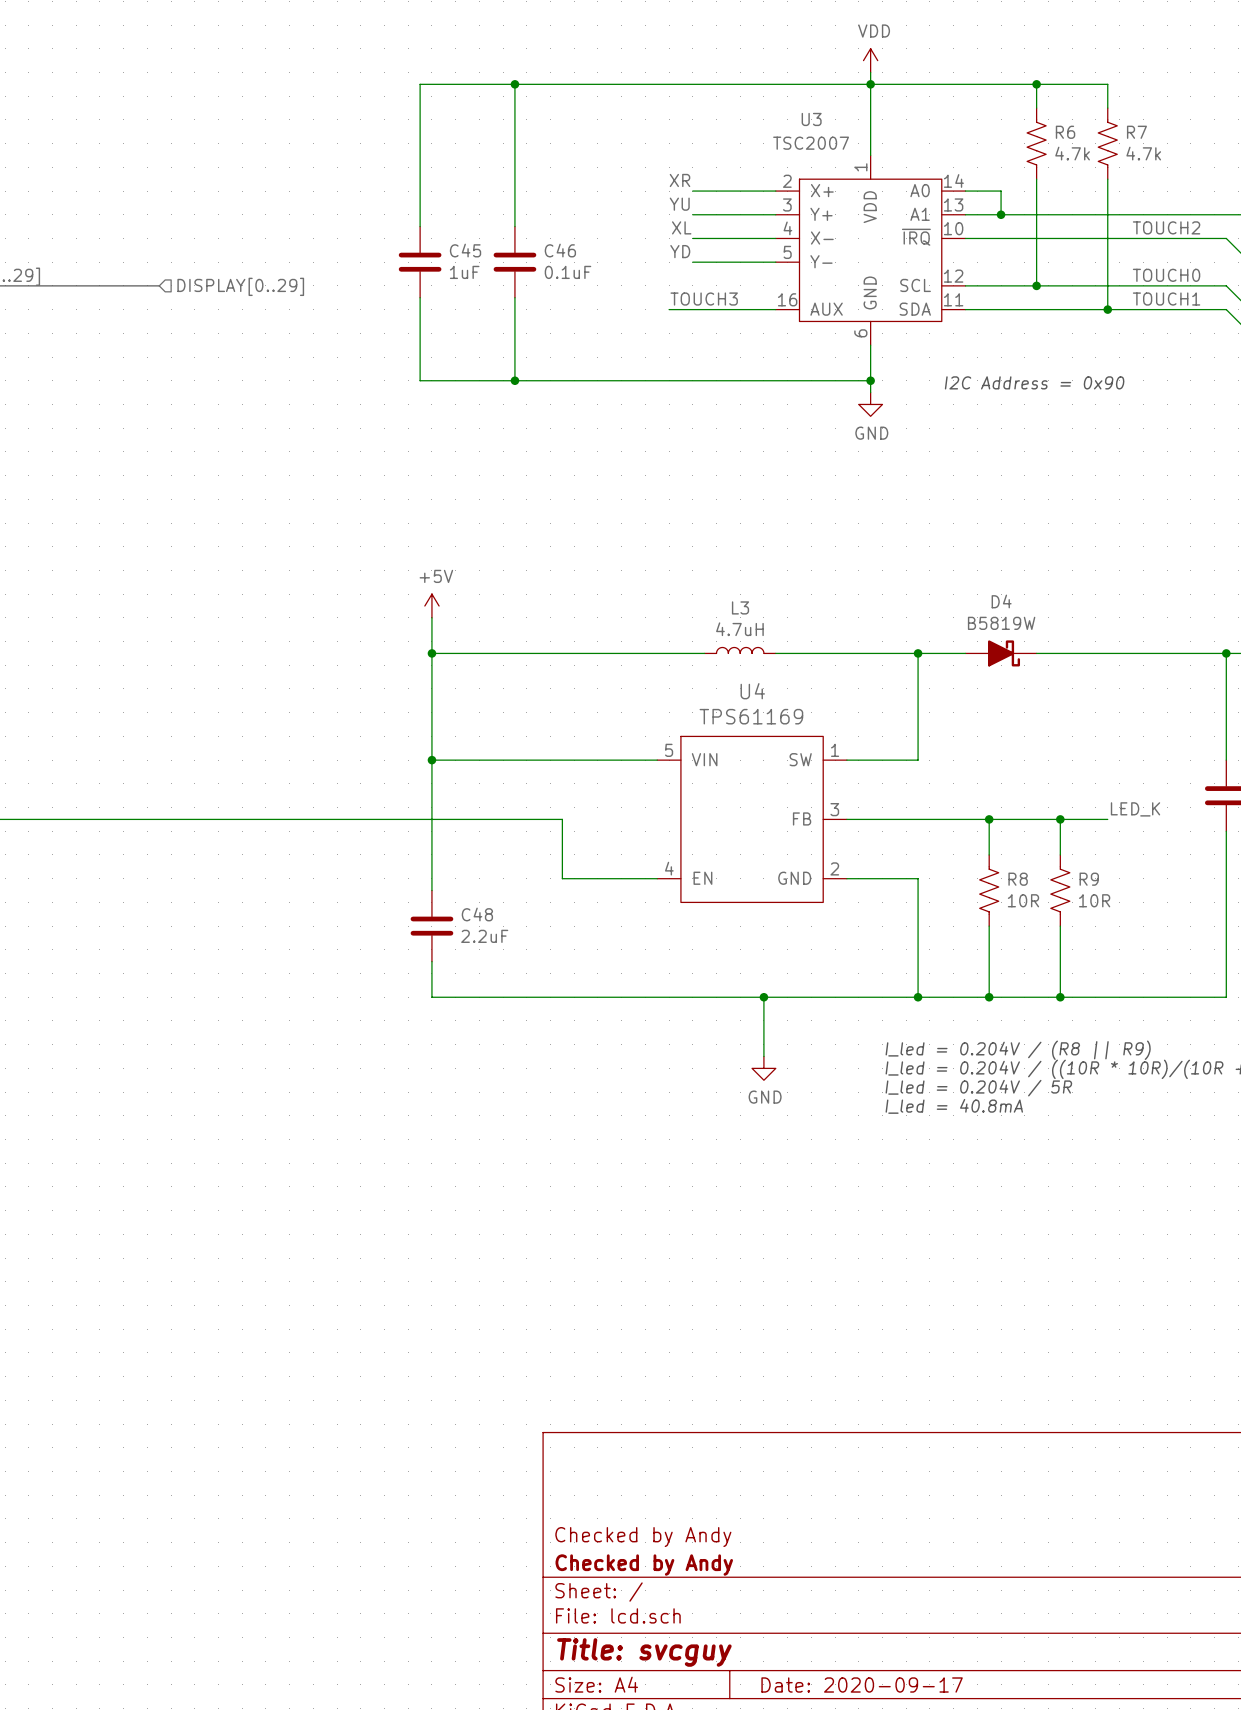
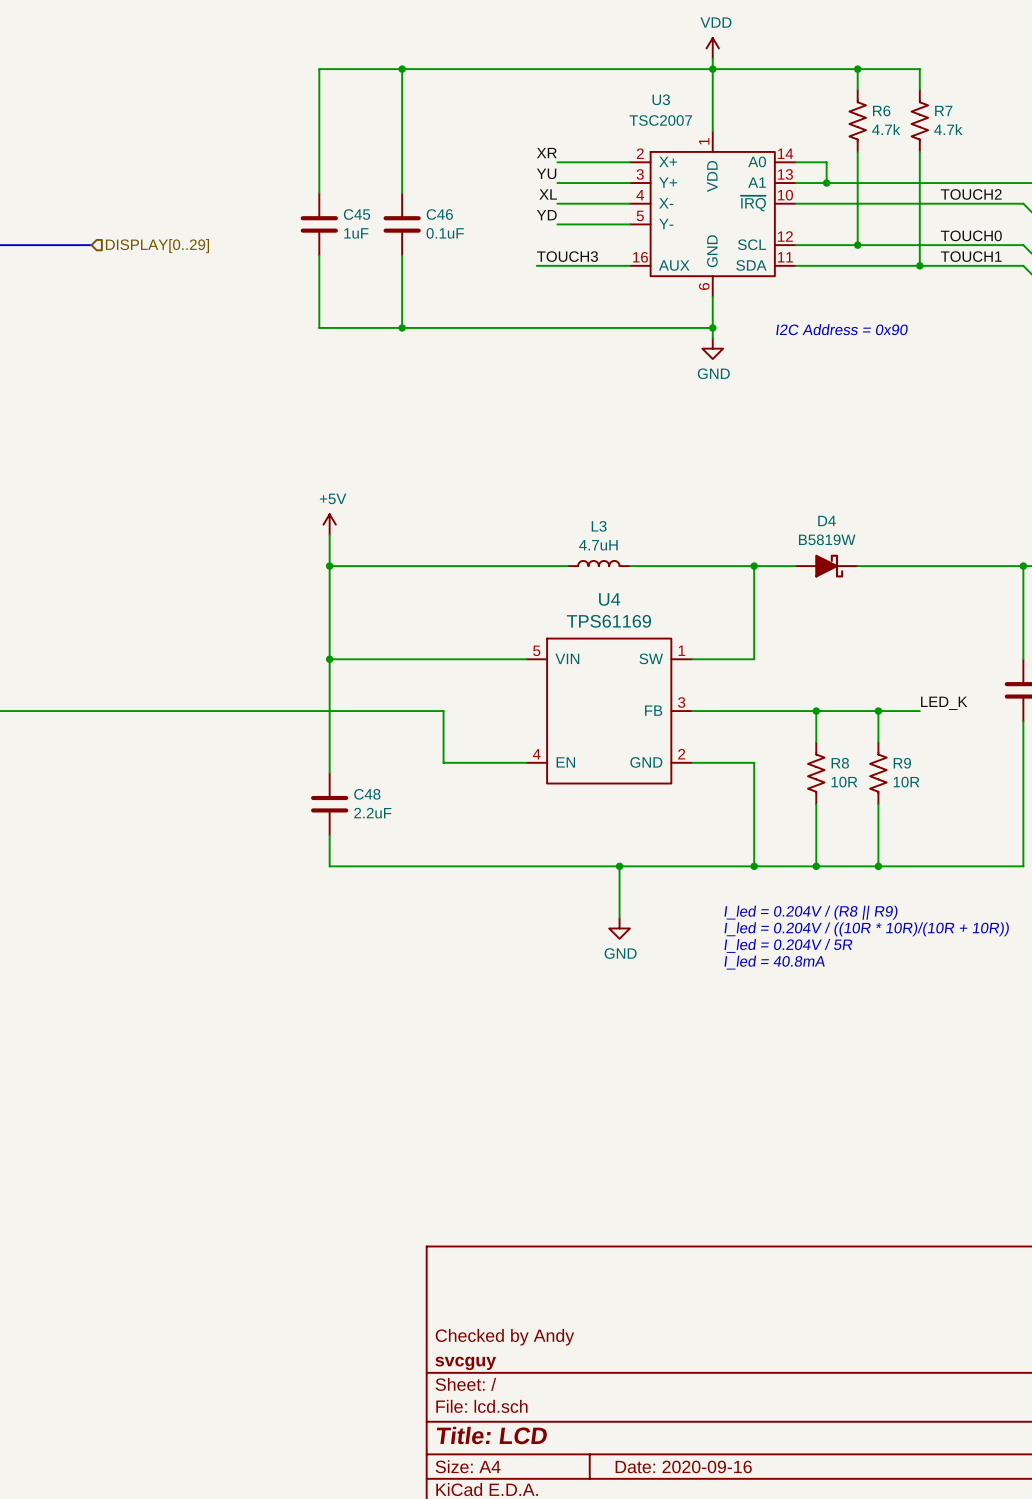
title block: Checked by Andy (644, 1565) -> svcguy (465, 1363)
title block: Title: svcguy (644, 1652) -> Title: LCD (492, 1435)
title block: Date: 2020-09-17 (862, 1685) -> Date: 2020-09-16 (683, 1466)

